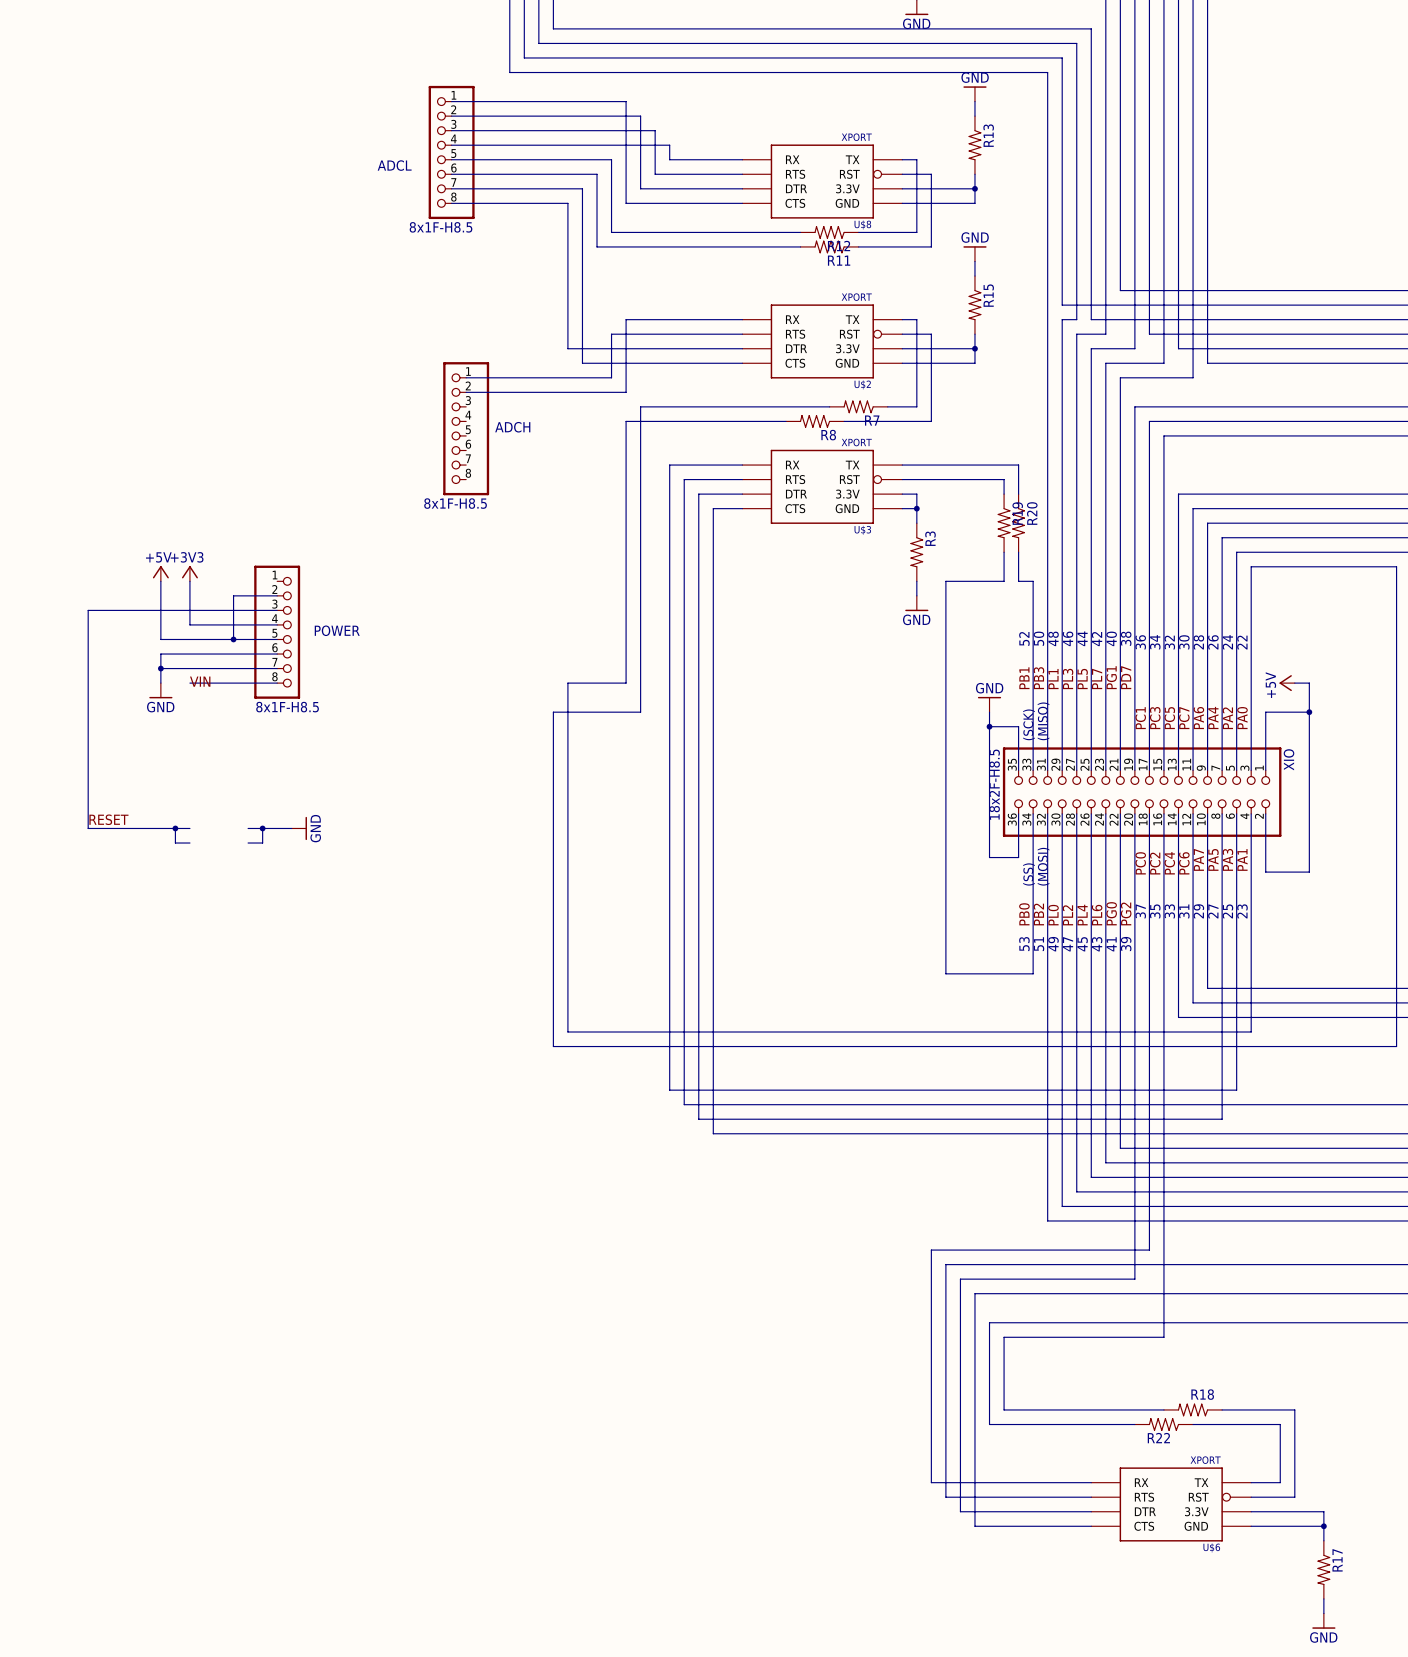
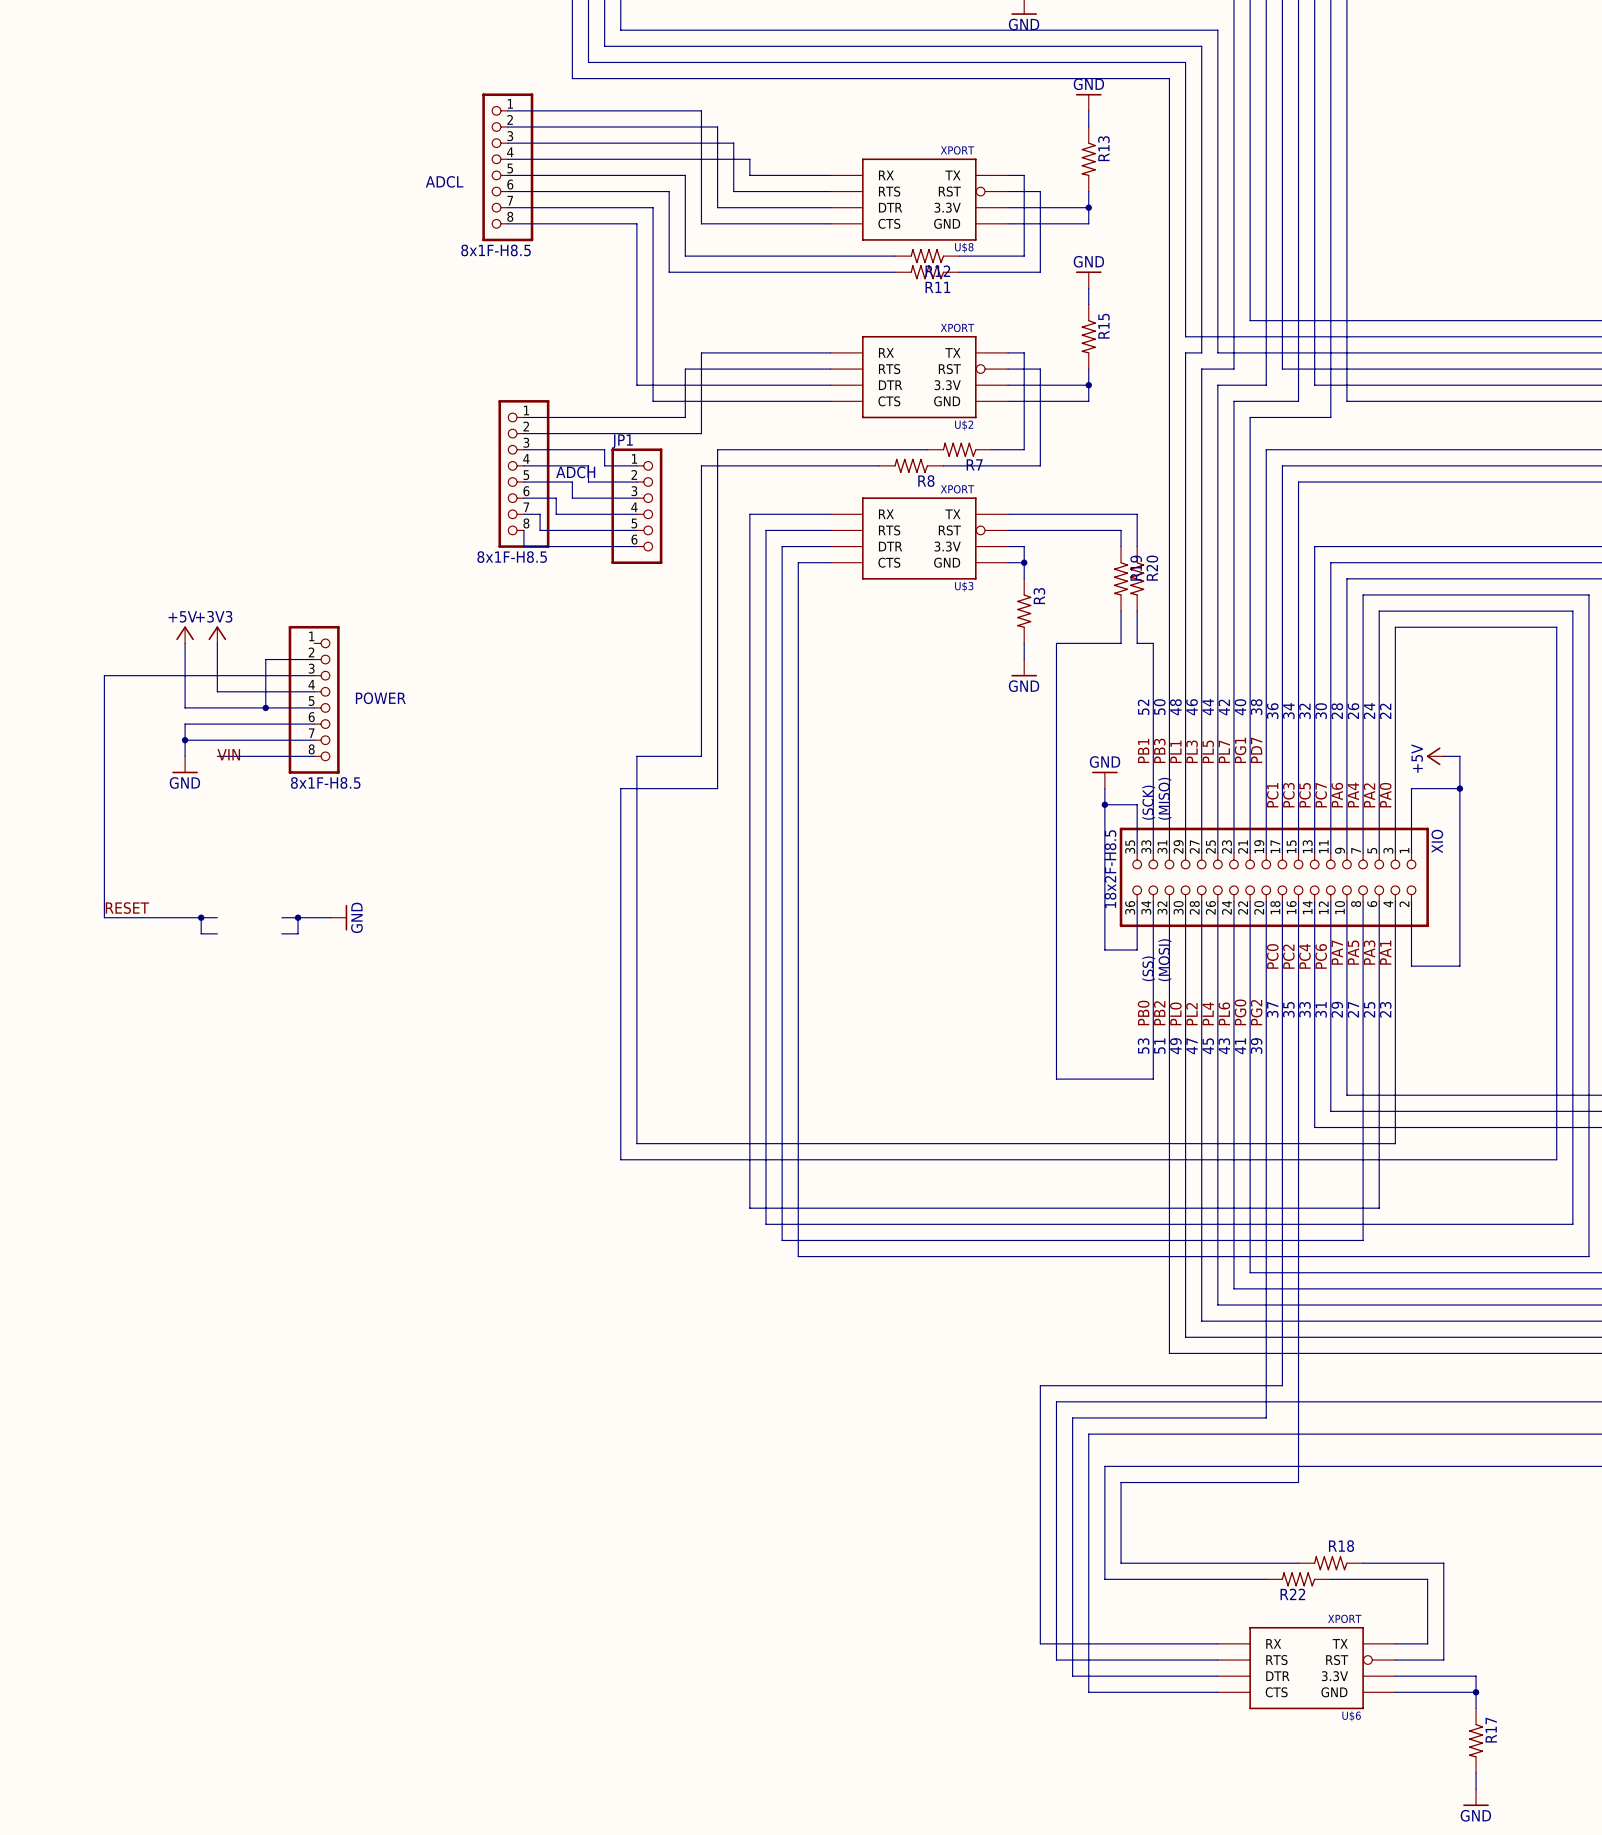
wire: none -> (523, 449) (604, 449) (604, 465) (636, 465)
wire: none -> (523, 465) (588, 465) (588, 482) (636, 482)
wire: none -> (523, 482) (572, 482) (572, 498) (636, 498)
wire: none -> (523, 498) (556, 498) (556, 514) (636, 514)
JP1: none -> (636, 506)
wire: none -> (523, 514) (540, 514) (540, 530) (636, 530)
wire: none -> (523, 530) (523, 546) (636, 546)

